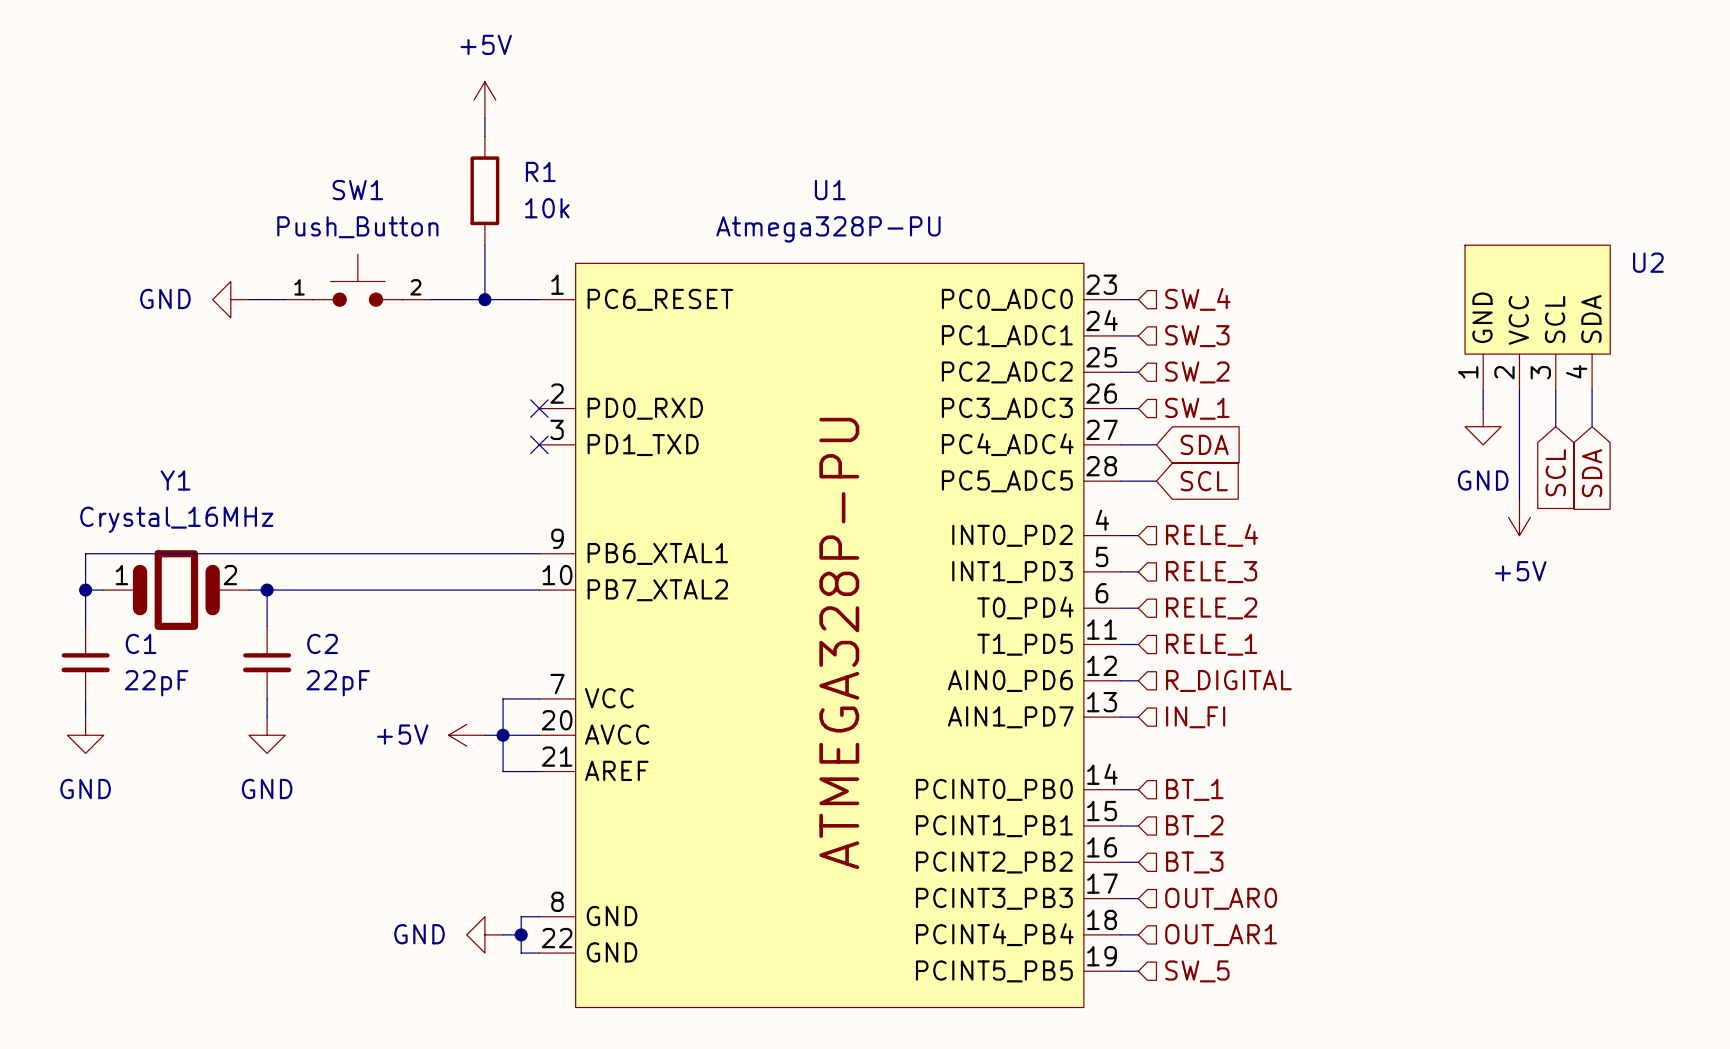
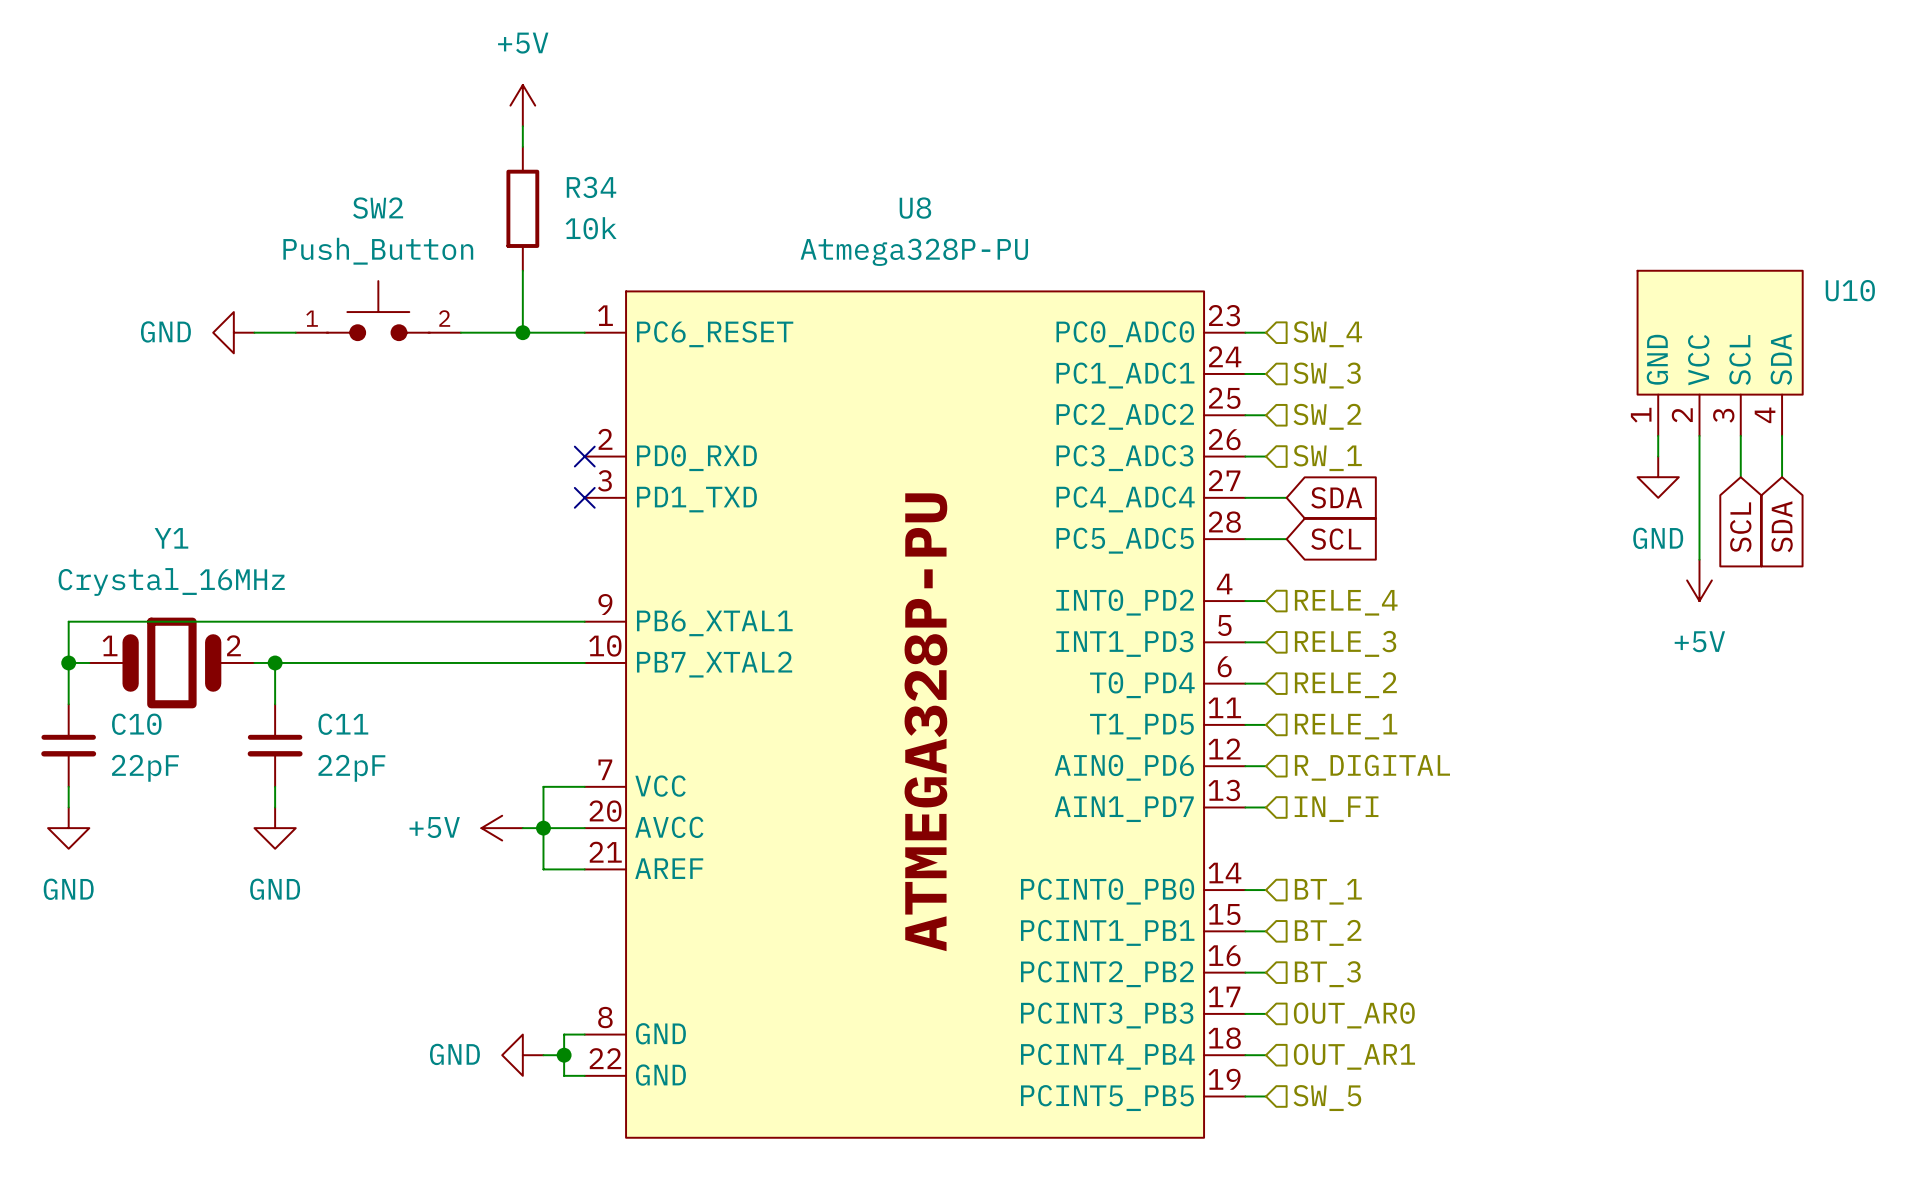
R1 name: R1 (540, 171) -> R34 (591, 187)
SW1 name: SW1 (357, 190) -> SW2 (378, 208)
U1 name: U1 (830, 190) -> U8 (915, 208)
U2 name: U2 (1648, 262) -> U10 (1850, 290)
C1 name: C1 (141, 643) -> C10 (136, 724)
C2 name: C2 (322, 643) -> C11 (343, 724)

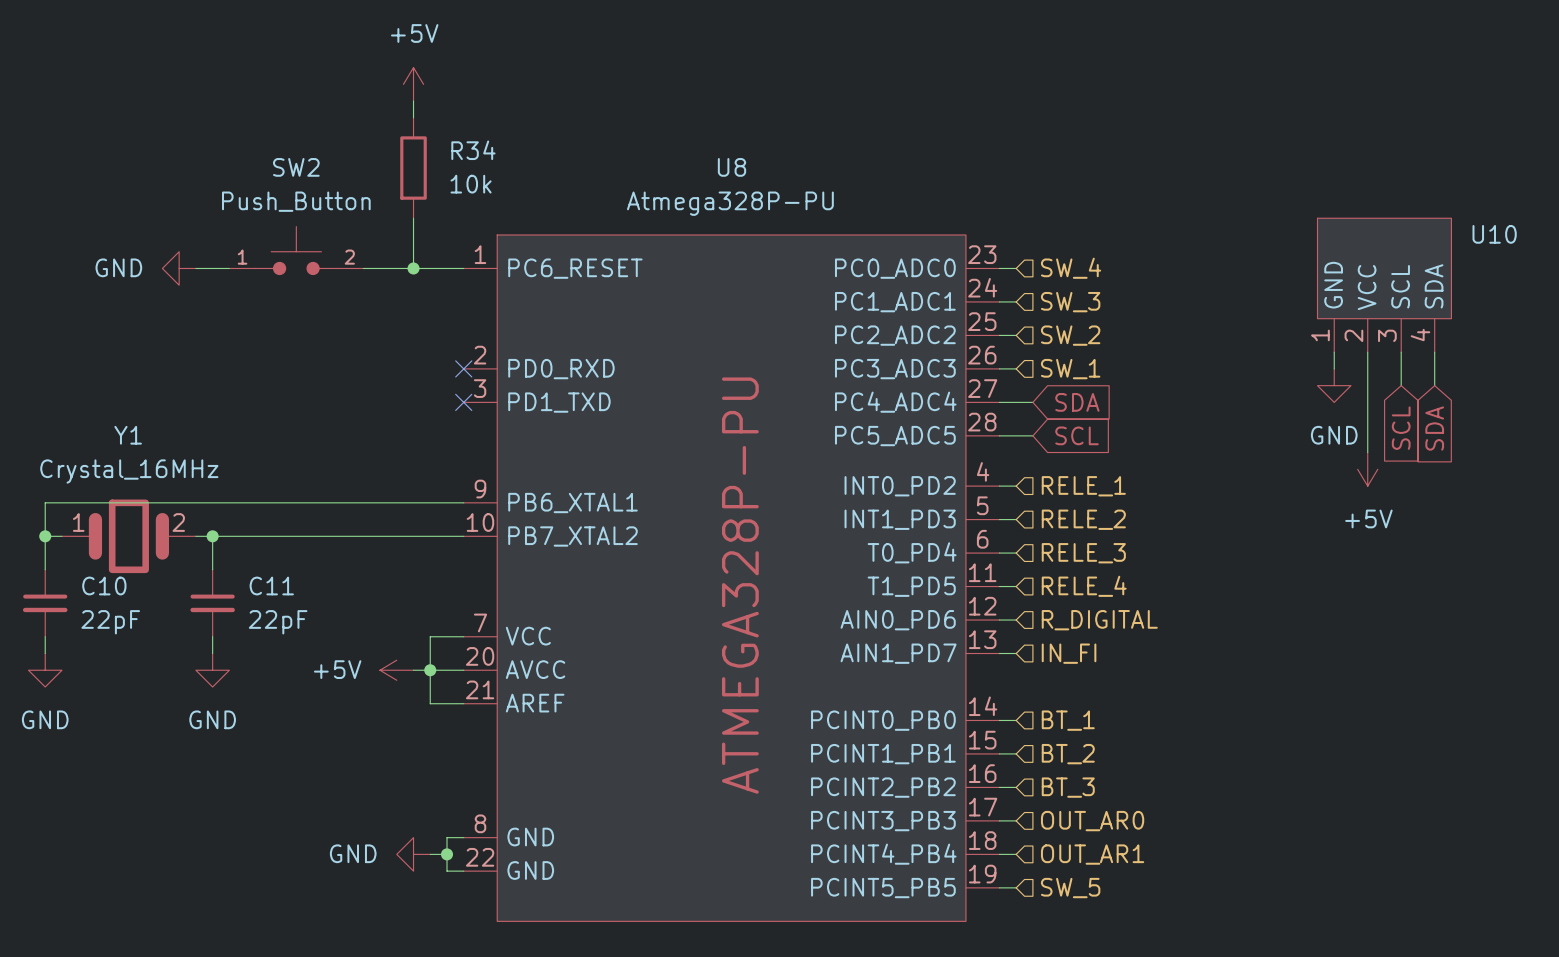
hierarchical label: RELE_4 (1346, 602) -> RELE_1 (1083, 486)
hierarchical label: RELE_3 (1345, 643) -> RELE_2 (1083, 519)
hierarchical label: RELE_2 (1345, 685) -> RELE_3 (1083, 553)
hierarchical label: RELE_1 (1346, 726) -> RELE_4 (1084, 586)

